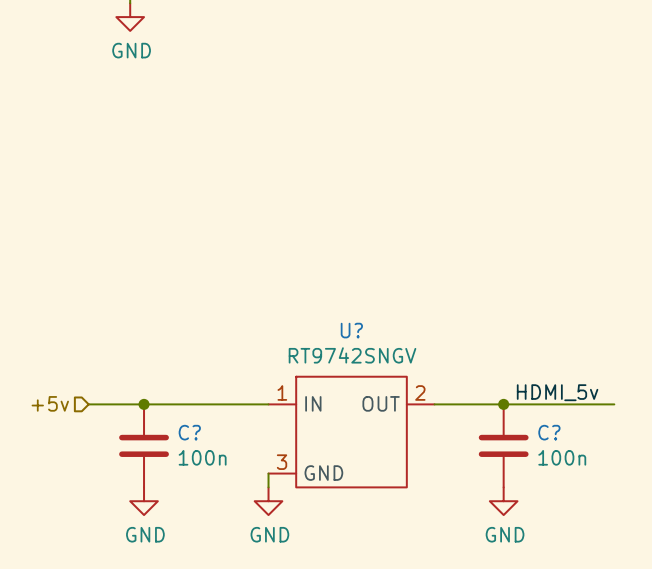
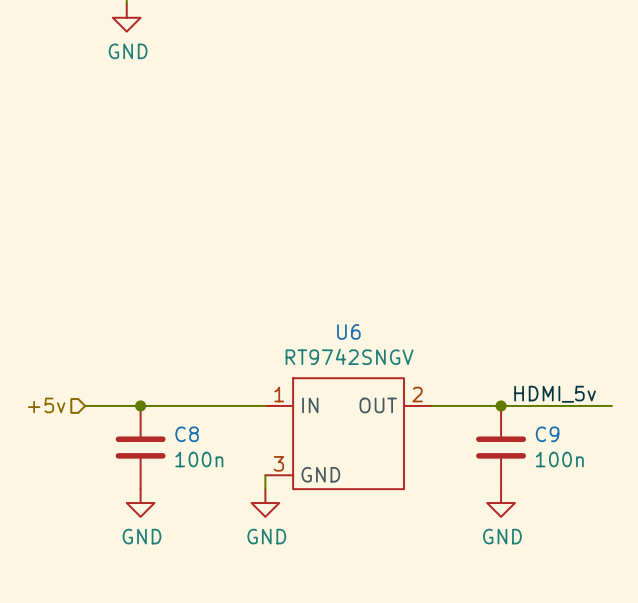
U? name: U? (351, 330) -> U6 (348, 331)
C? name: C? (189, 432) -> C8 (187, 434)
C? name: C? (549, 432) -> C9 (547, 434)

